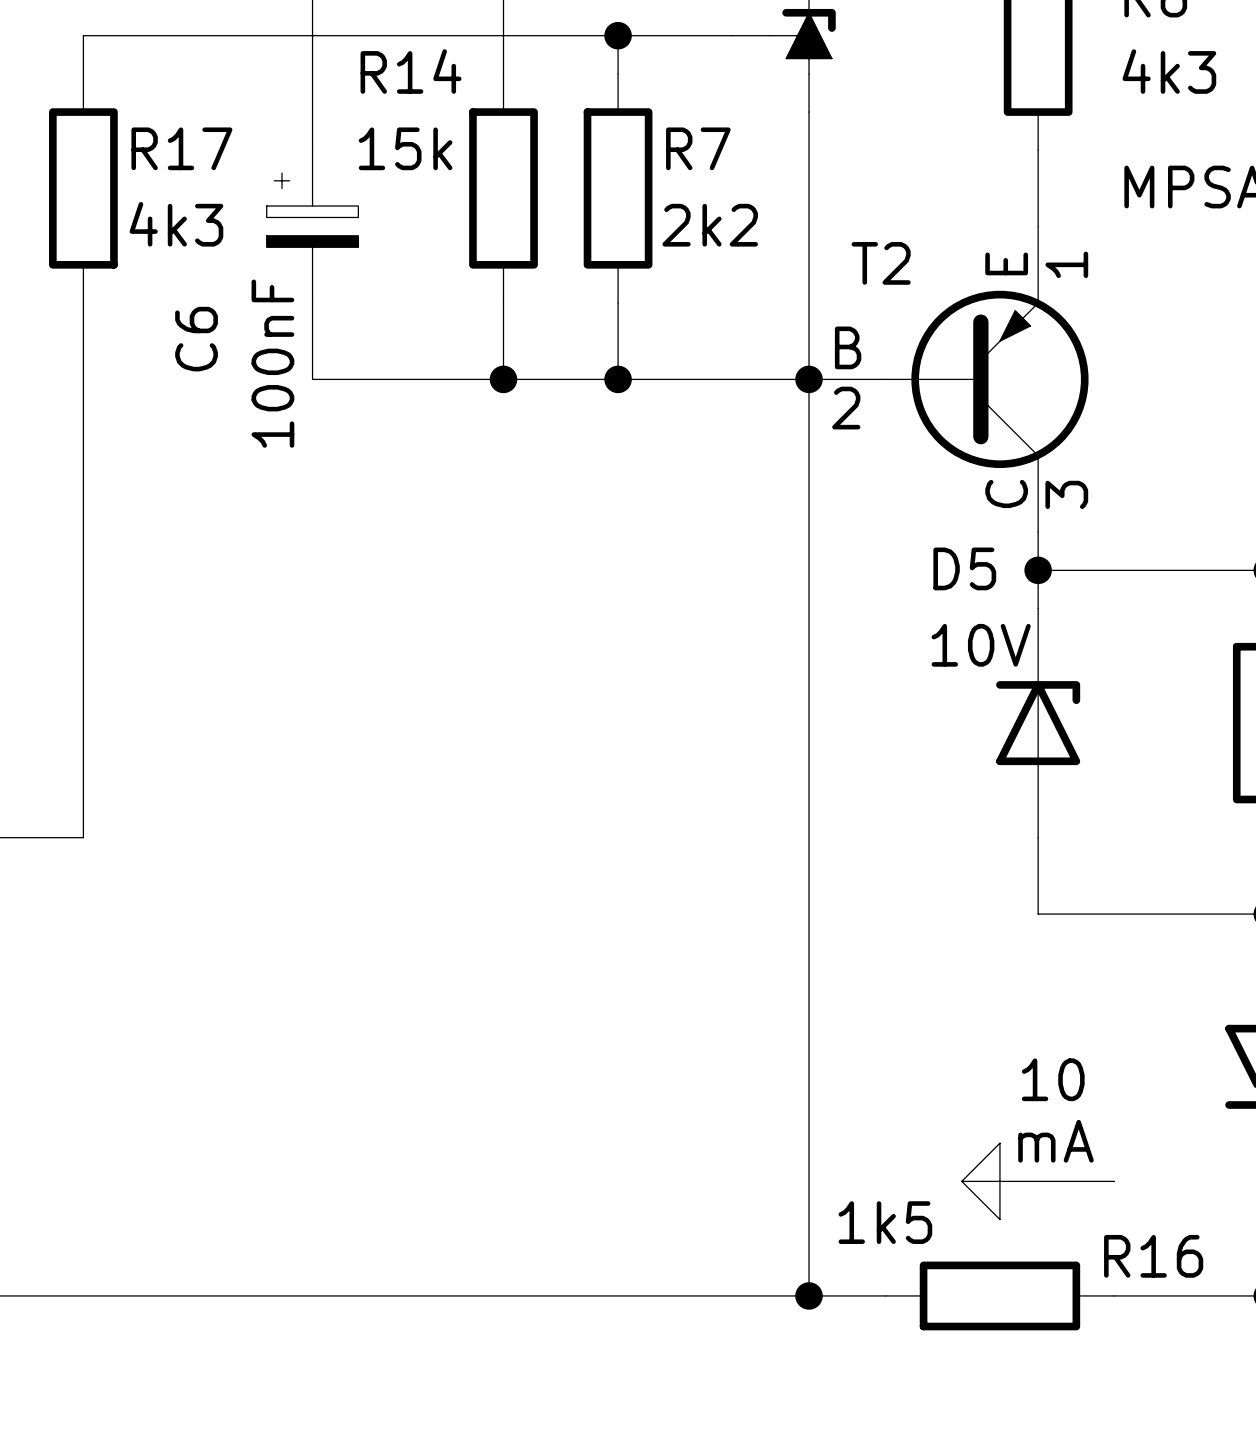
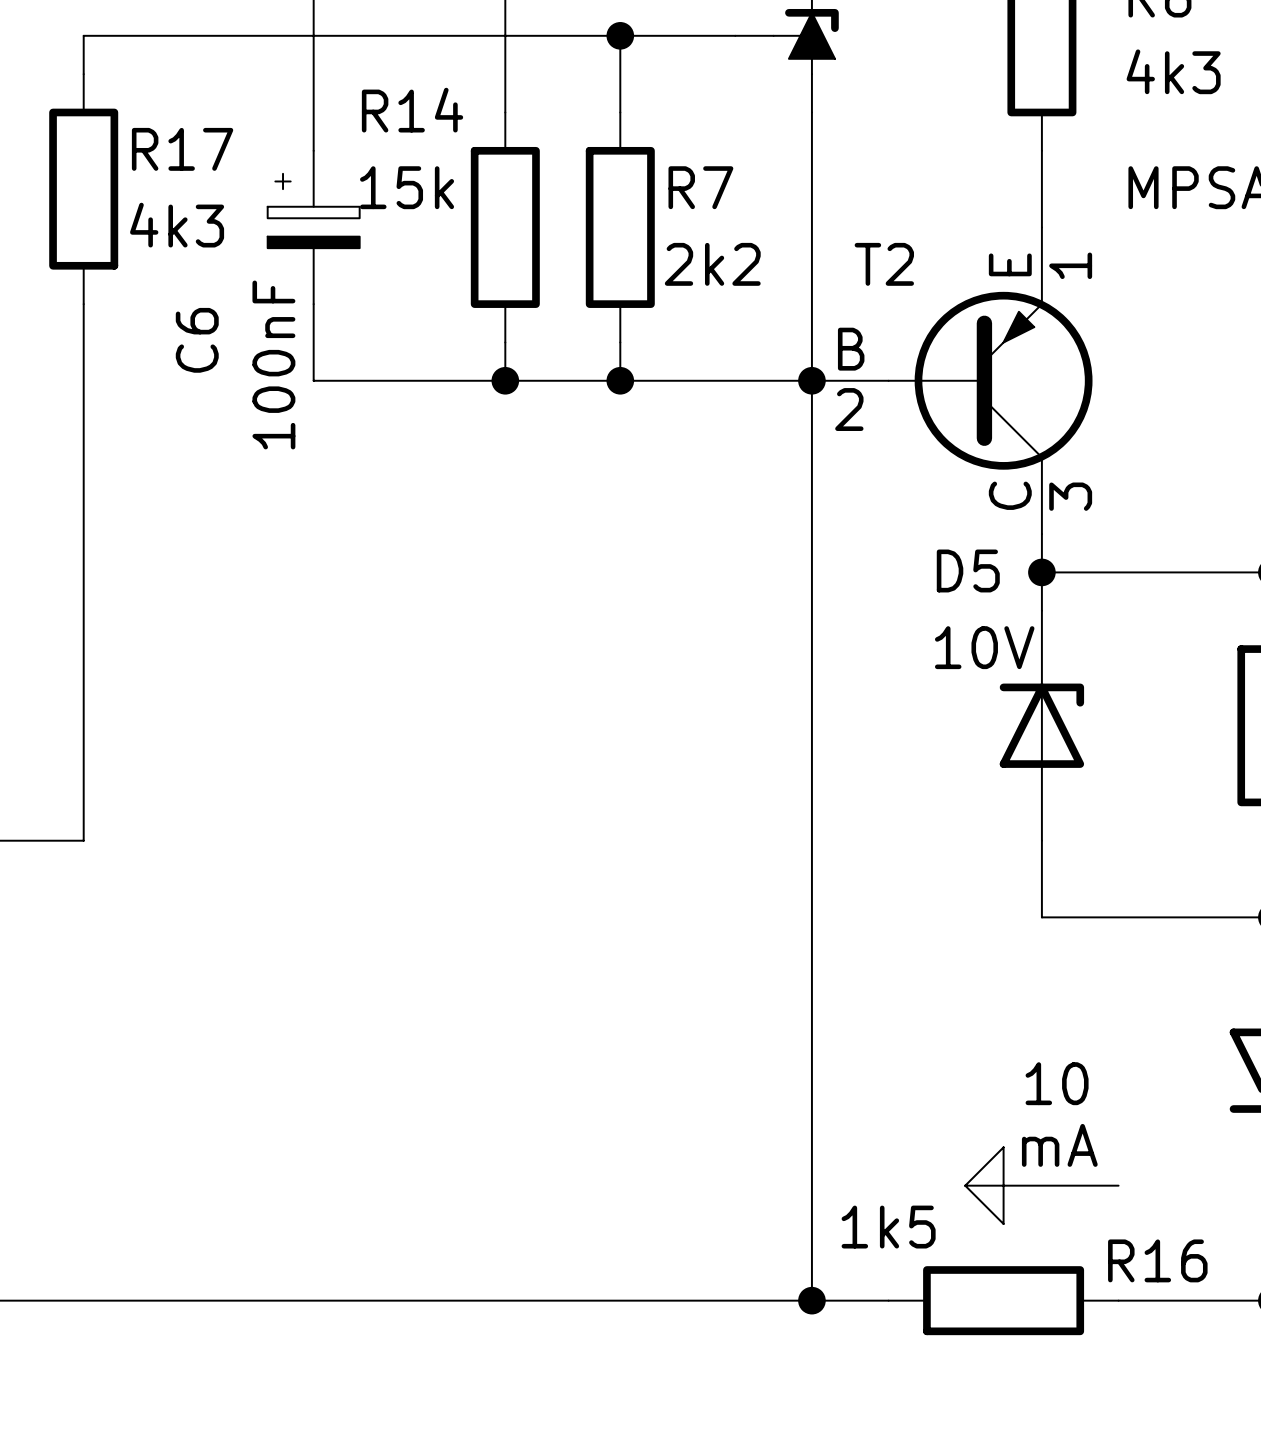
R14 position: (503, 188) -> (505, 227)
R7 position: (618, 188) -> (620, 227)

